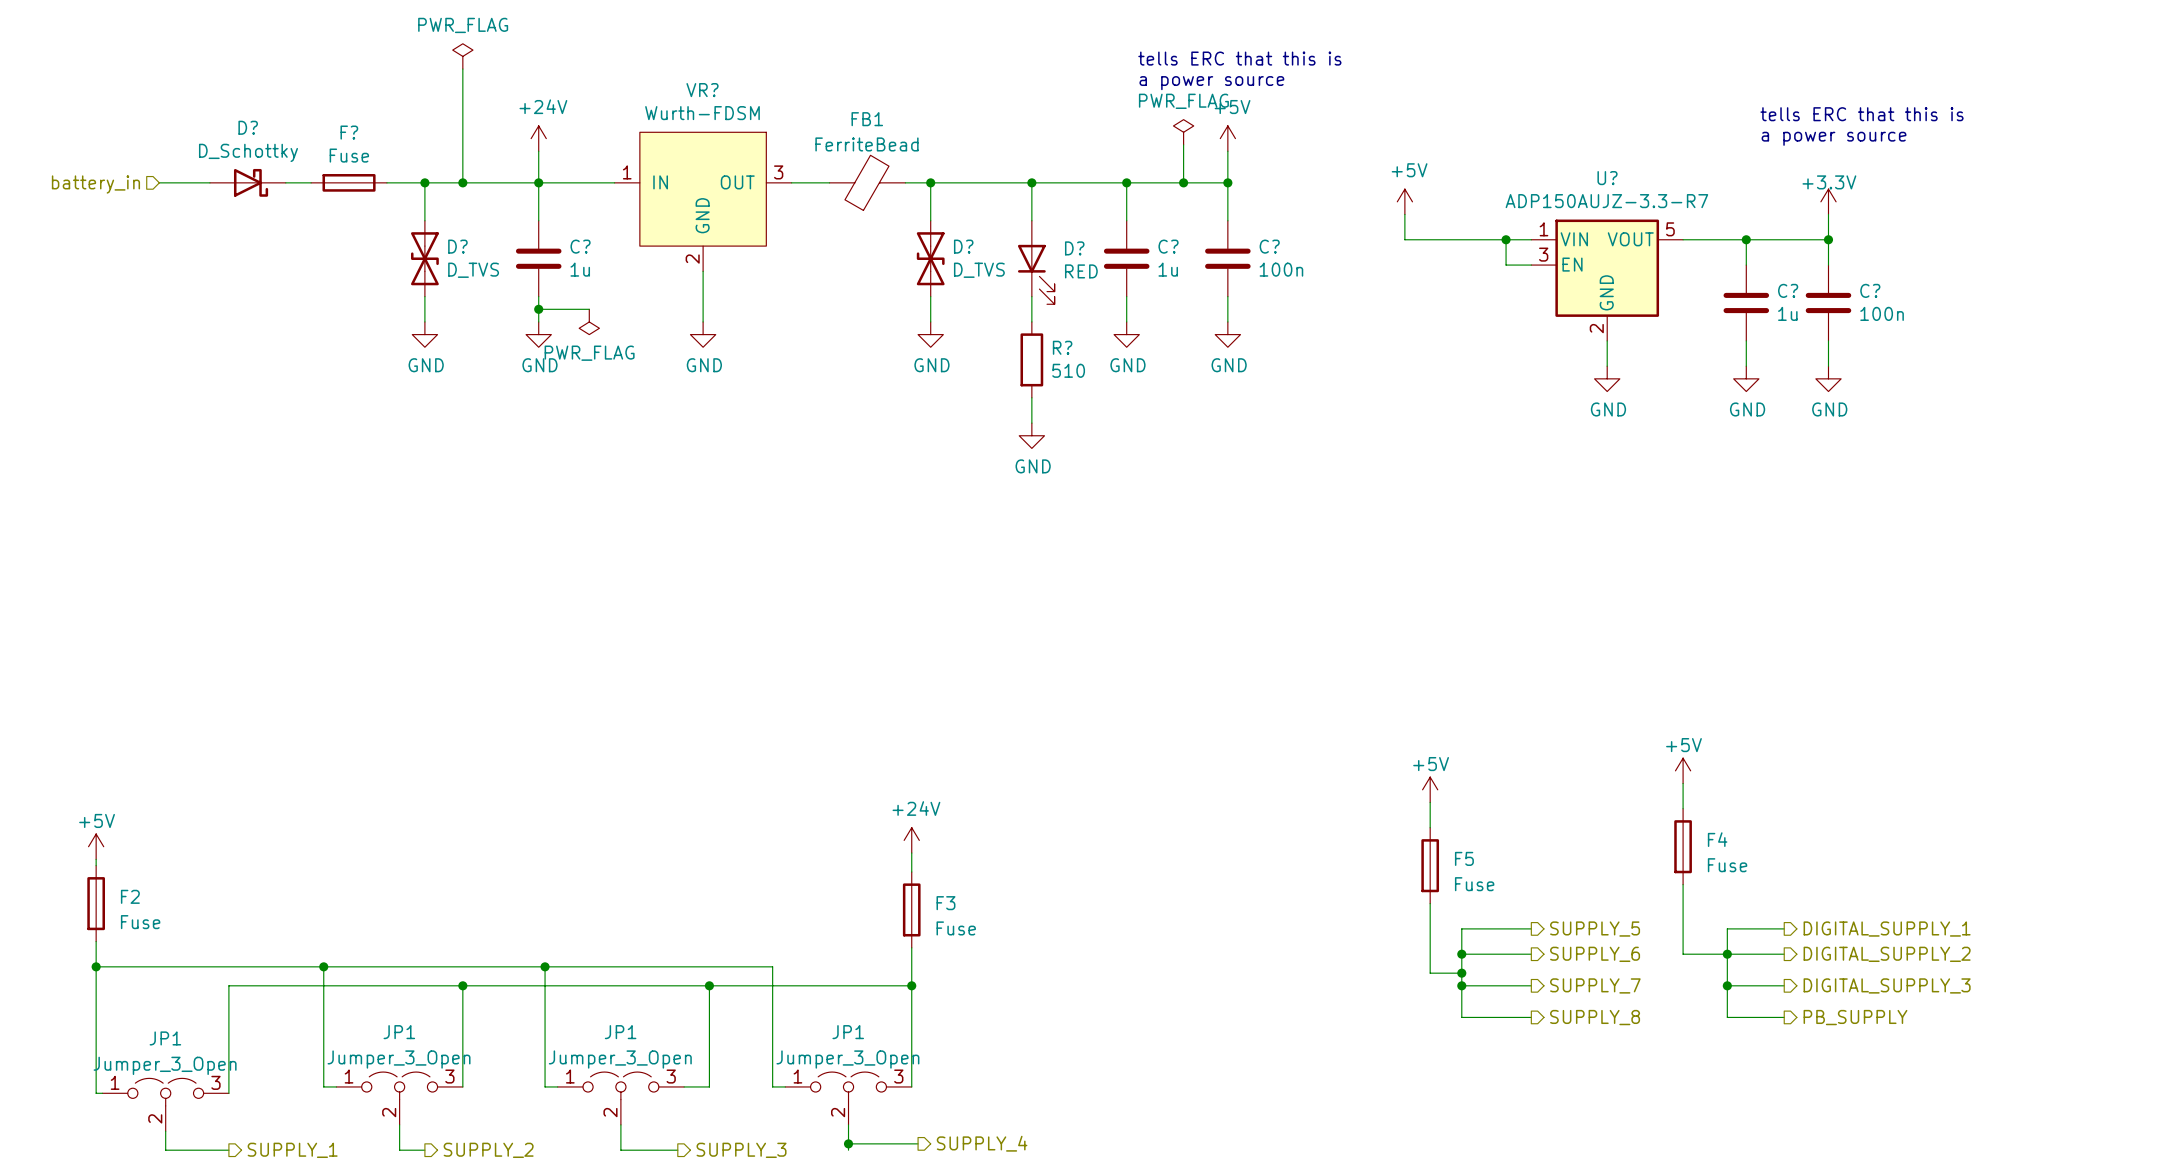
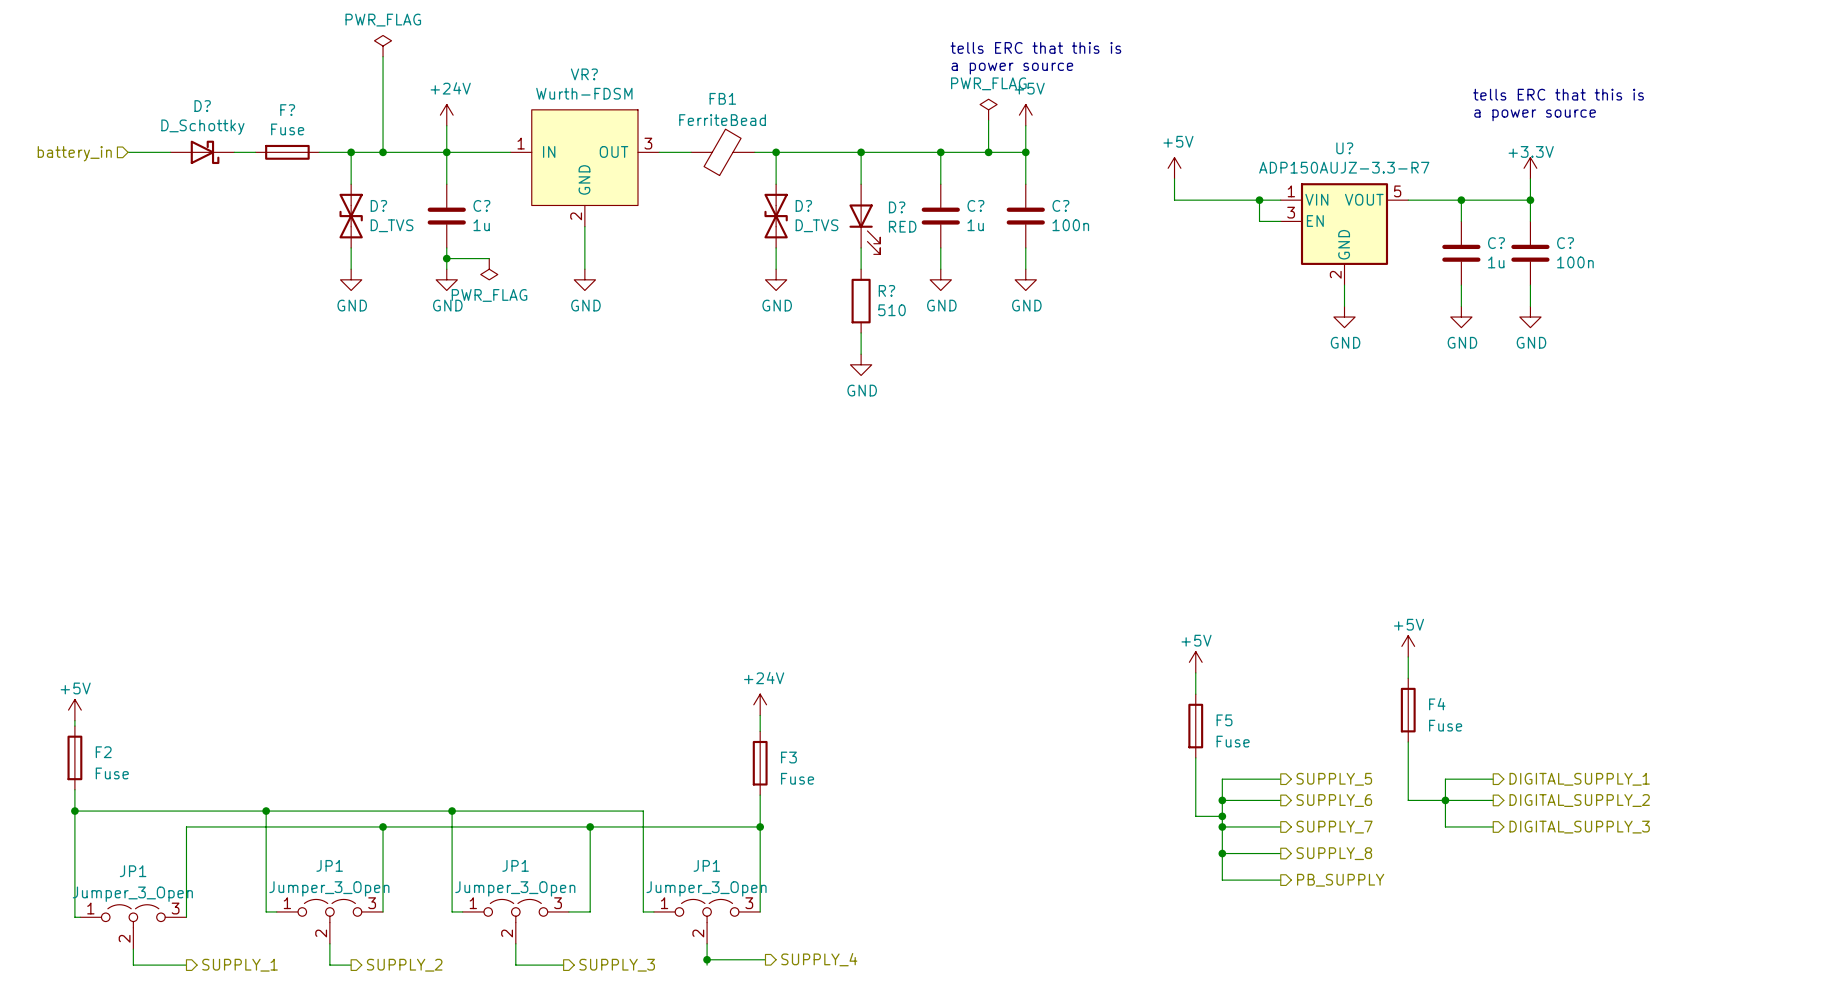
wire: (1727, 985) (1727, 1017) (1784, 1017) -> none
junction: (1727, 985) -> none
wire: none -> (1222, 853) (1222, 880) (1280, 880)
junction: none -> (1222, 853)
hierarchical label: PB_SUPPLY (1855, 1017) -> none
hierarchical label: none -> PB_SUPPLY (1340, 880)

